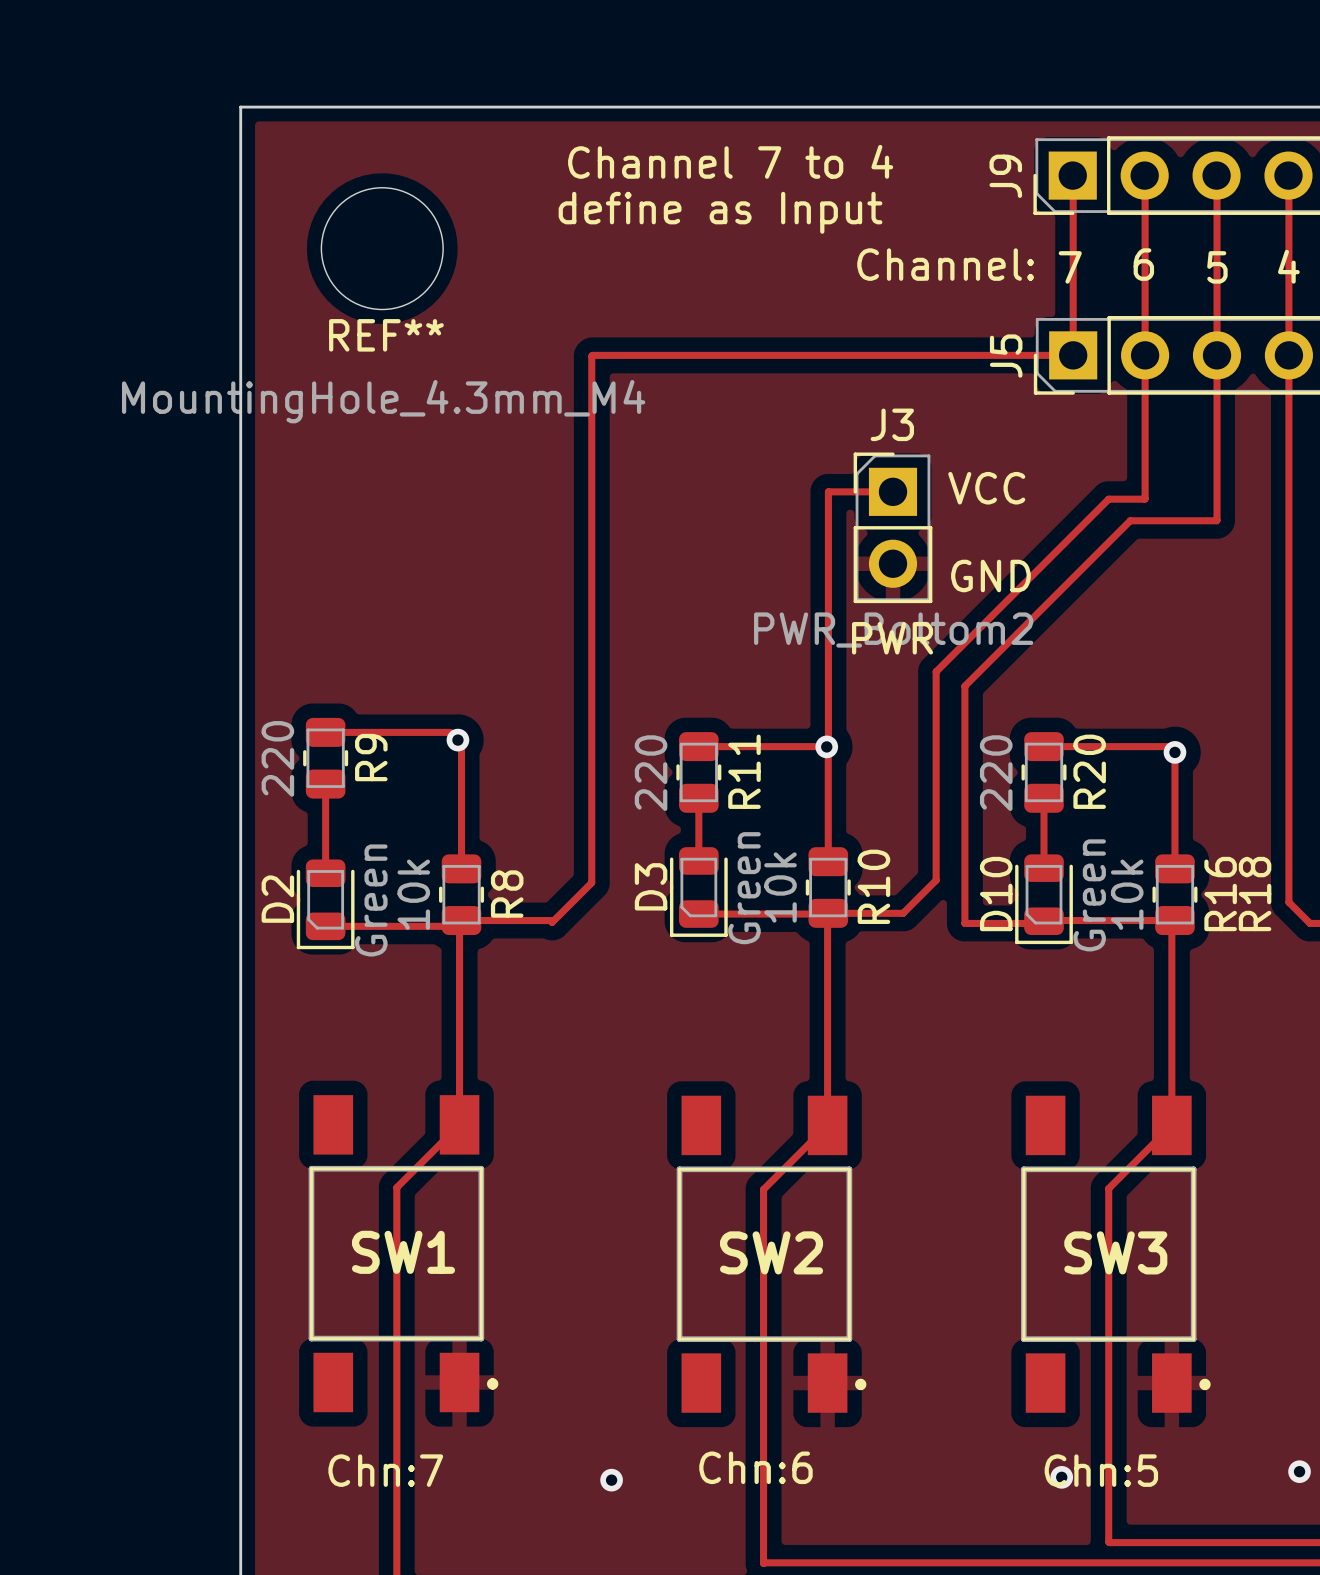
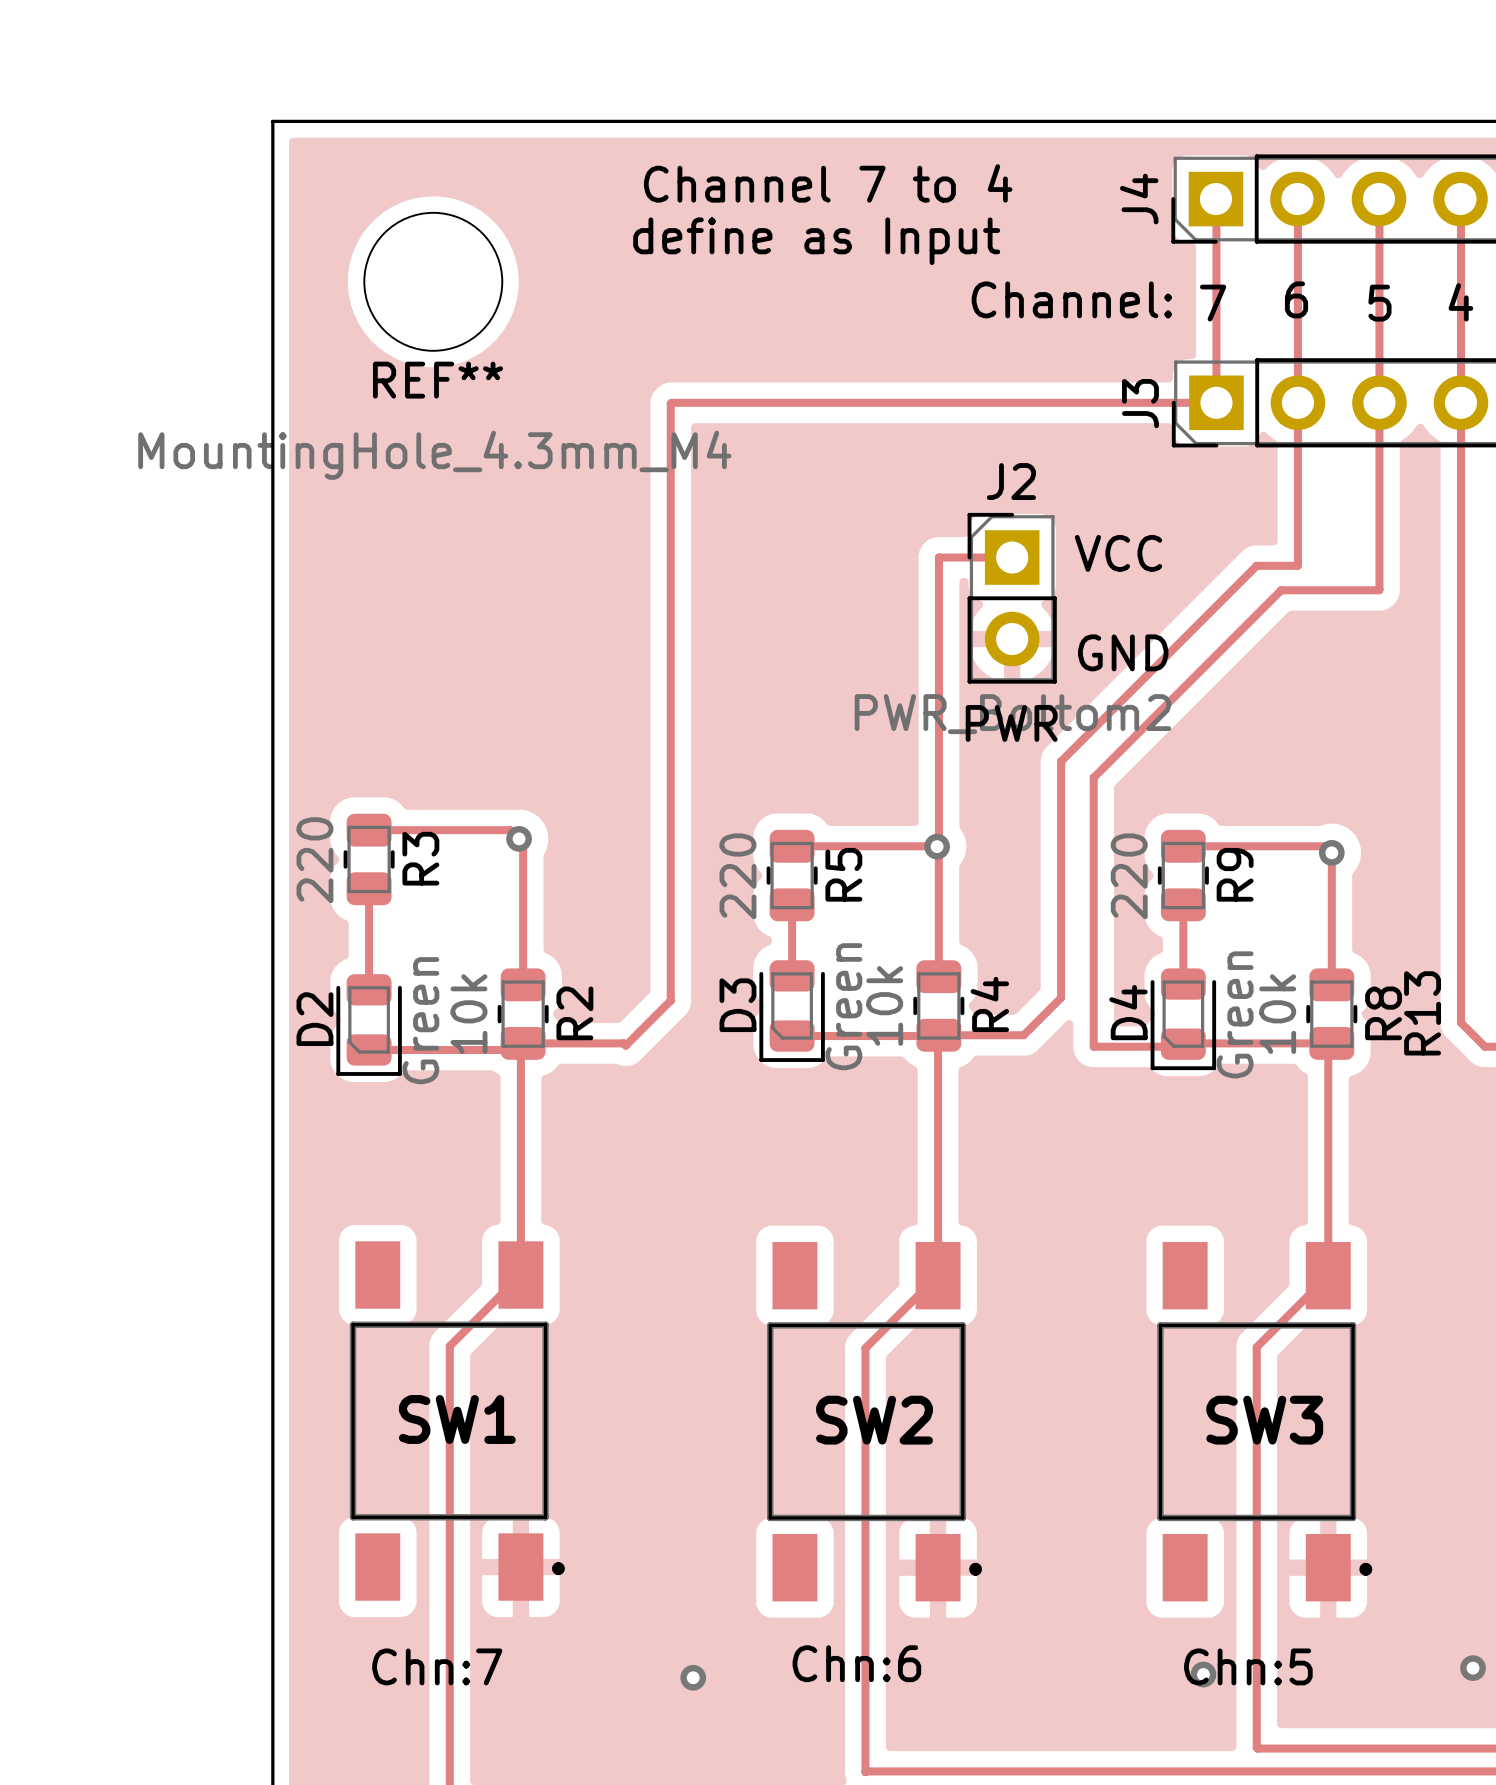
J9 name: J9 (1005, 176) -> J4 (1139, 199)
J5 name: J5 (1006, 356) -> J3 (1140, 403)
J3 name: J3 (892, 424) -> J2 (1011, 481)
R9 name: R9 (371, 757) -> R3 (420, 858)
R11 name: R11 (744, 771) -> R5 (843, 874)
R20 name: R20 (1089, 771) -> R9 (1235, 874)
R10 name: R10 (873, 886) -> R4 (989, 1004)
R8 name: R8 (507, 894) -> R2 (574, 1013)
D10 name: D10 (996, 894) -> D4 (1128, 1012)
R16 name: R16 (1220, 894) -> R8 (1383, 1013)
R18 name: R18 (1255, 894) -> R13 (1422, 1013)

